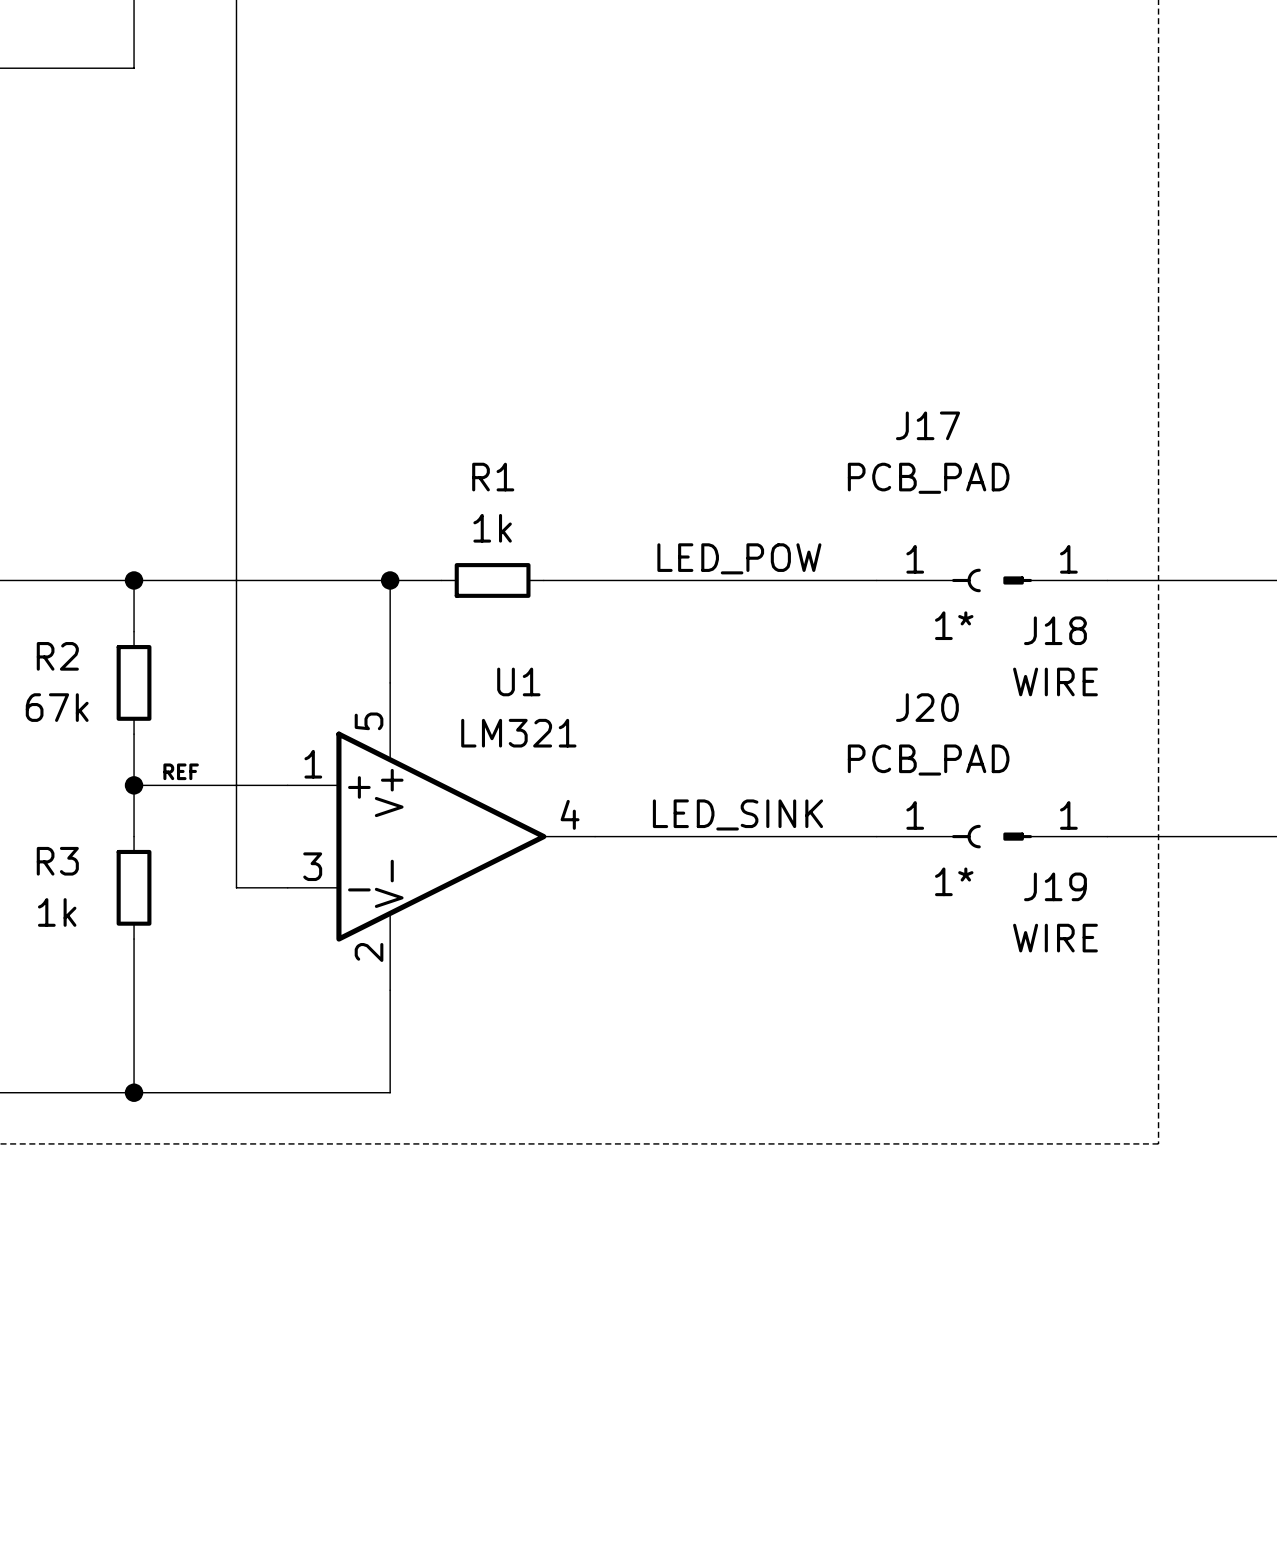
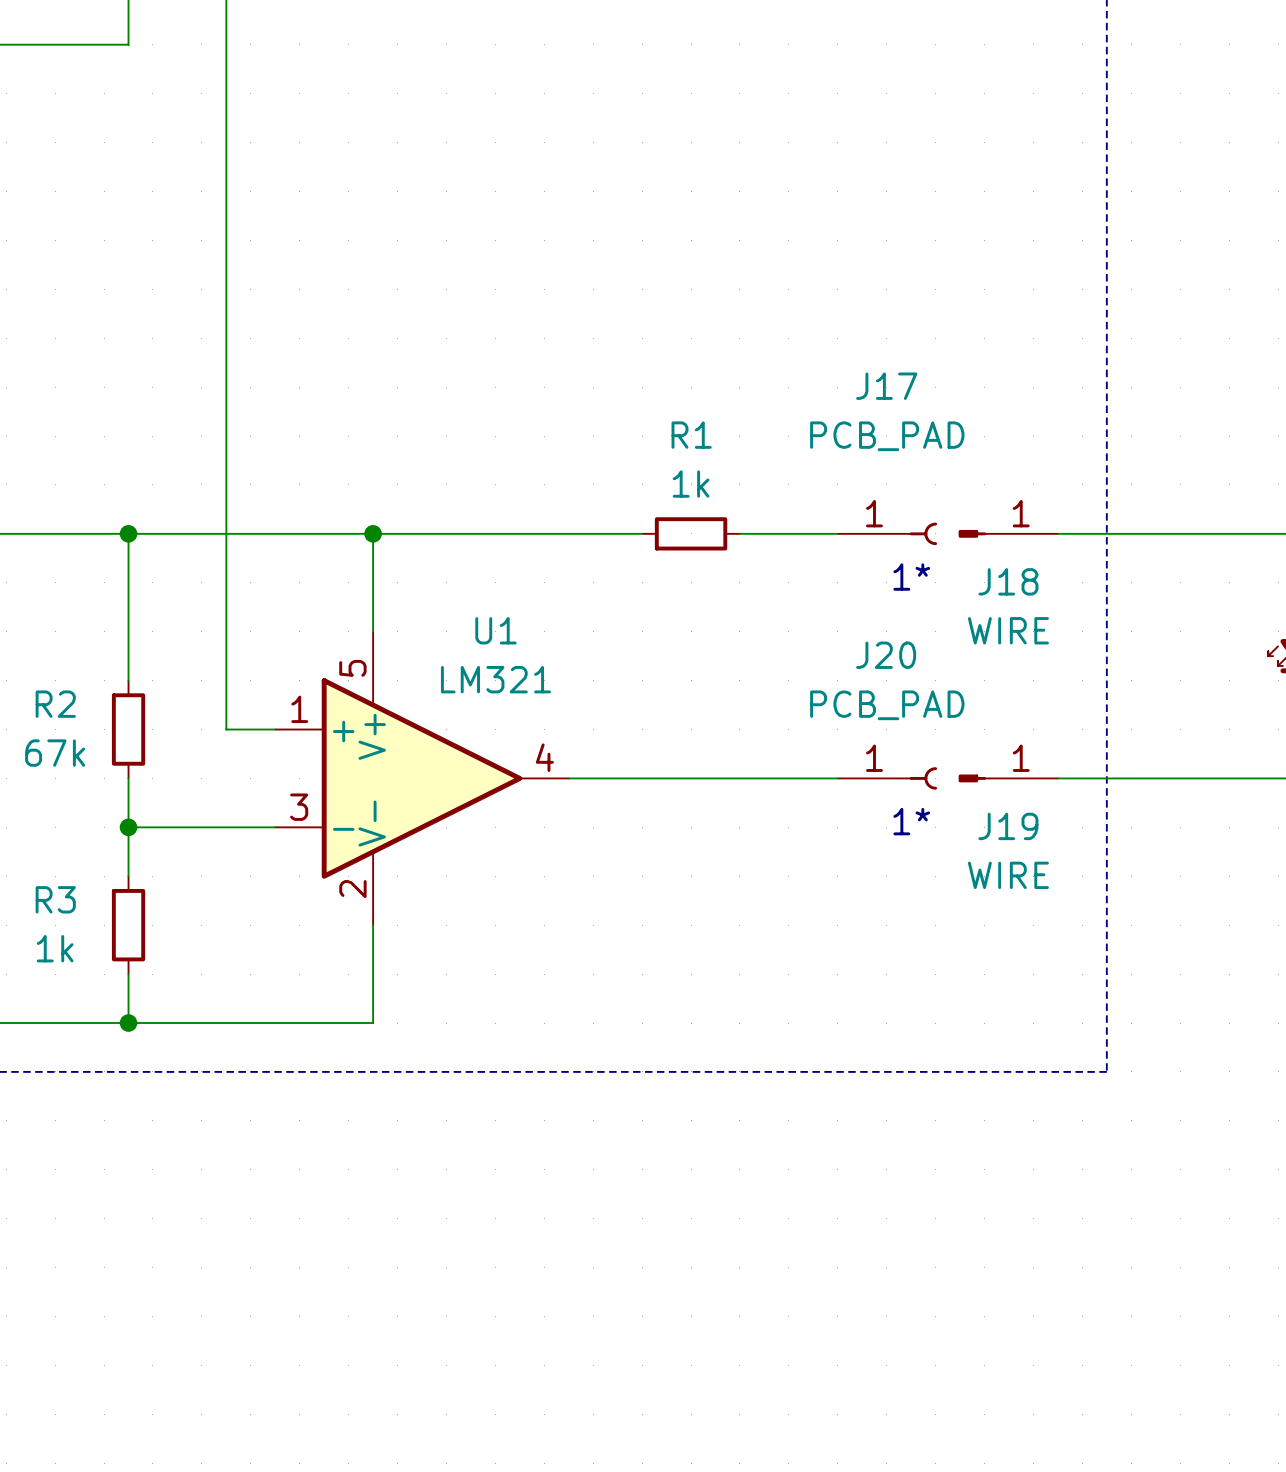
label: LED_POW (739, 558) -> none
R1 position: (492, 580) -> (691, 533)
wire: (671, 580) (774, 580) -> (422, 533) (519, 533)
R2 position: (134, 682) -> (128, 729)
wire: (134, 734) (134, 836) -> (128, 876) (128, 778)
label: REF (181, 771) -> none
wire: (134, 785) (236, 785) (236, 887) -> (128, 827) (226, 827)
junction position: (134, 785) -> (128, 827)
label: LED_SINK (737, 814) -> none
R3 position: (134, 887) -> (128, 925)
wire: (134, 939) (134, 1041) -> (128, 582) (128, 680)

